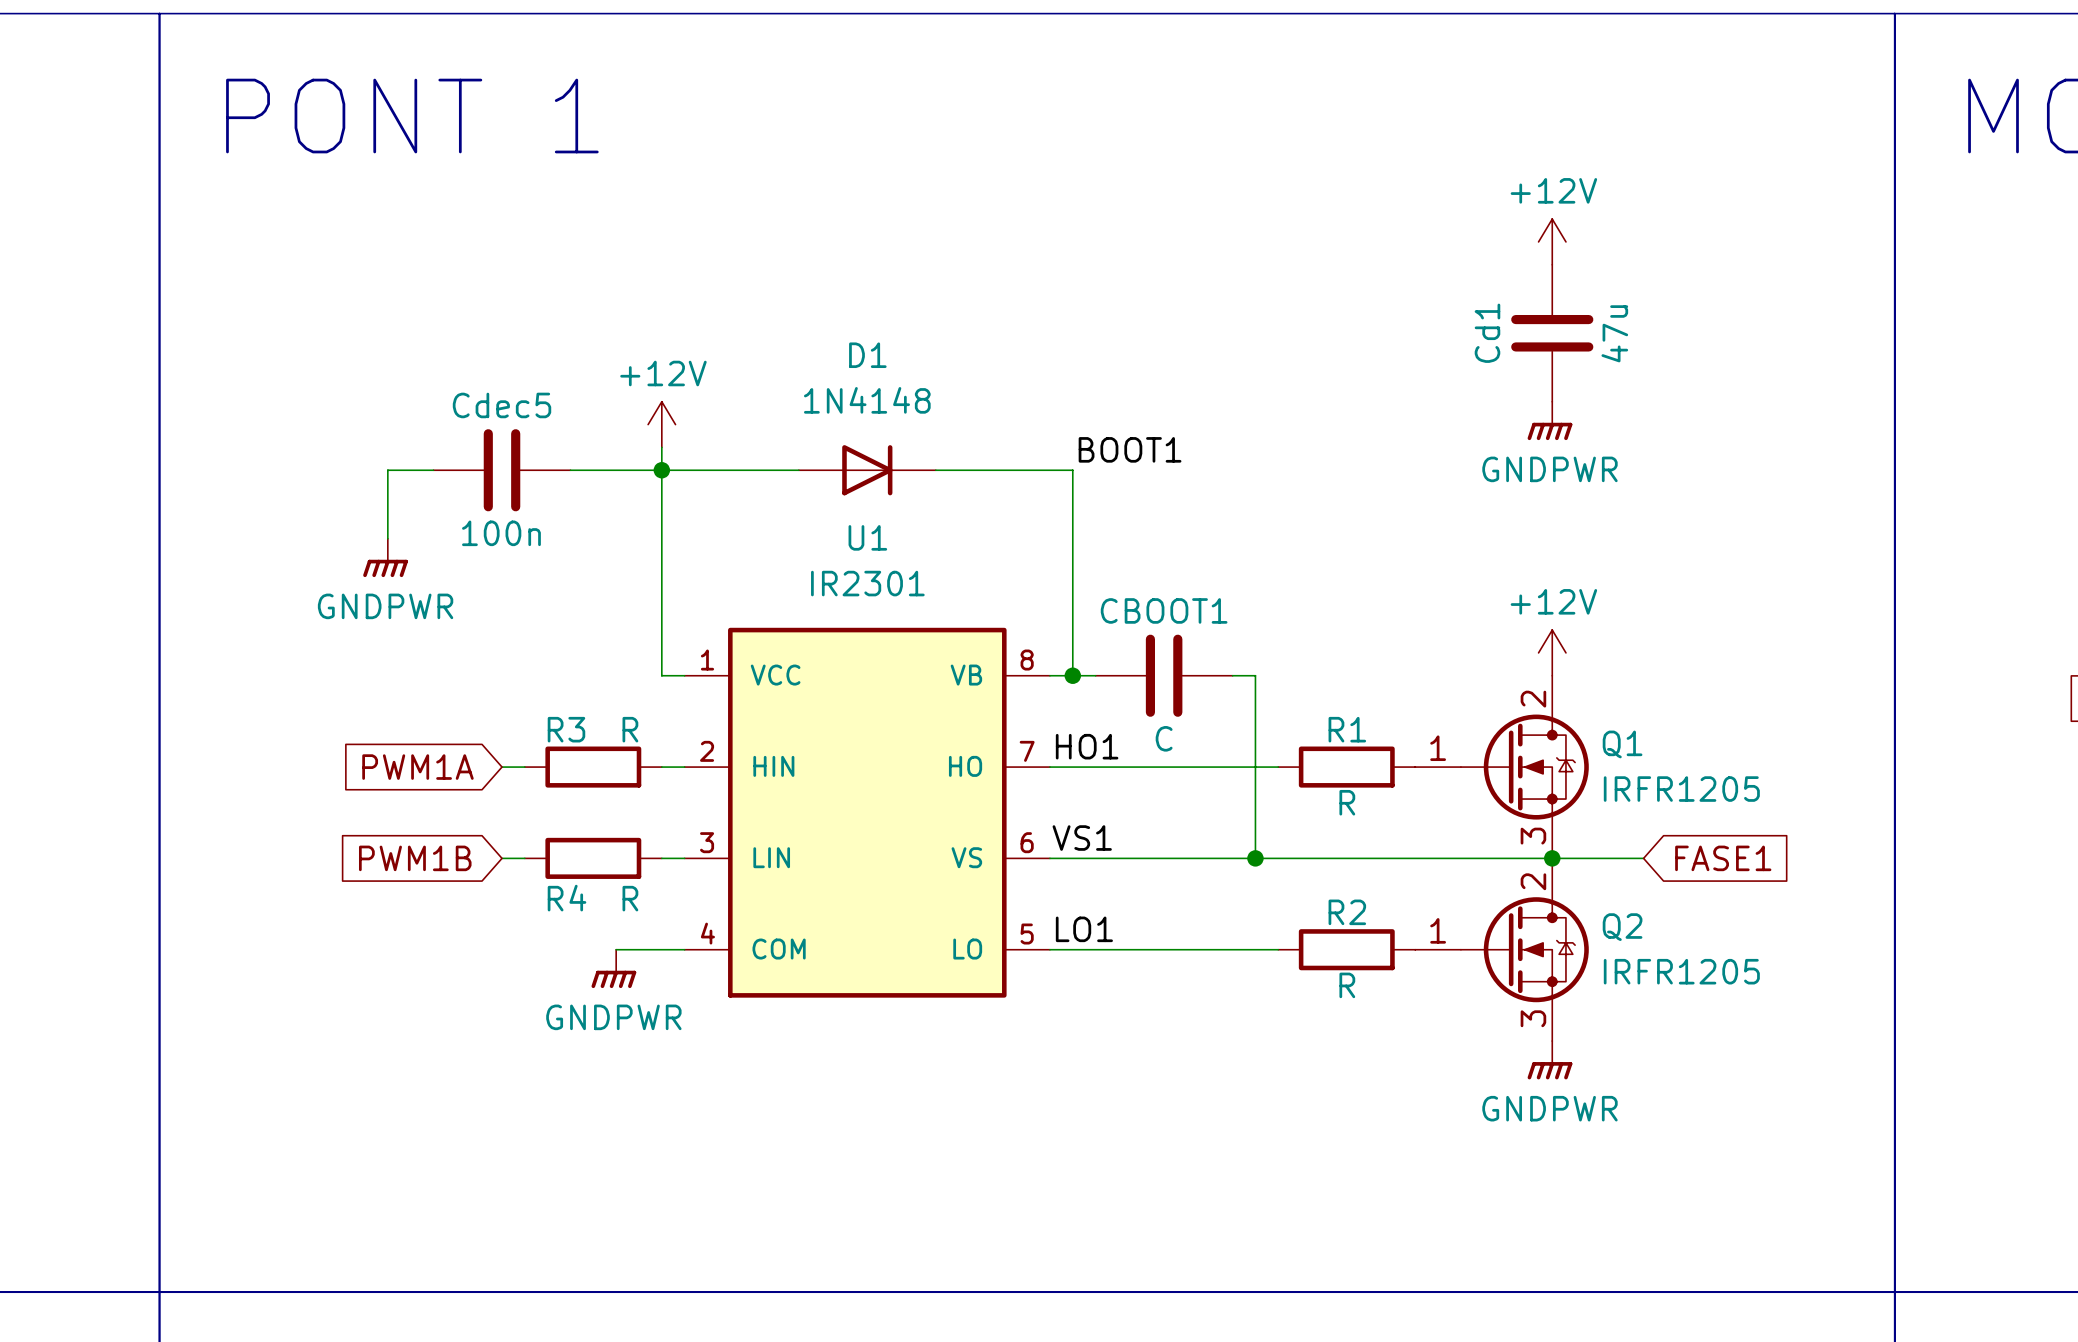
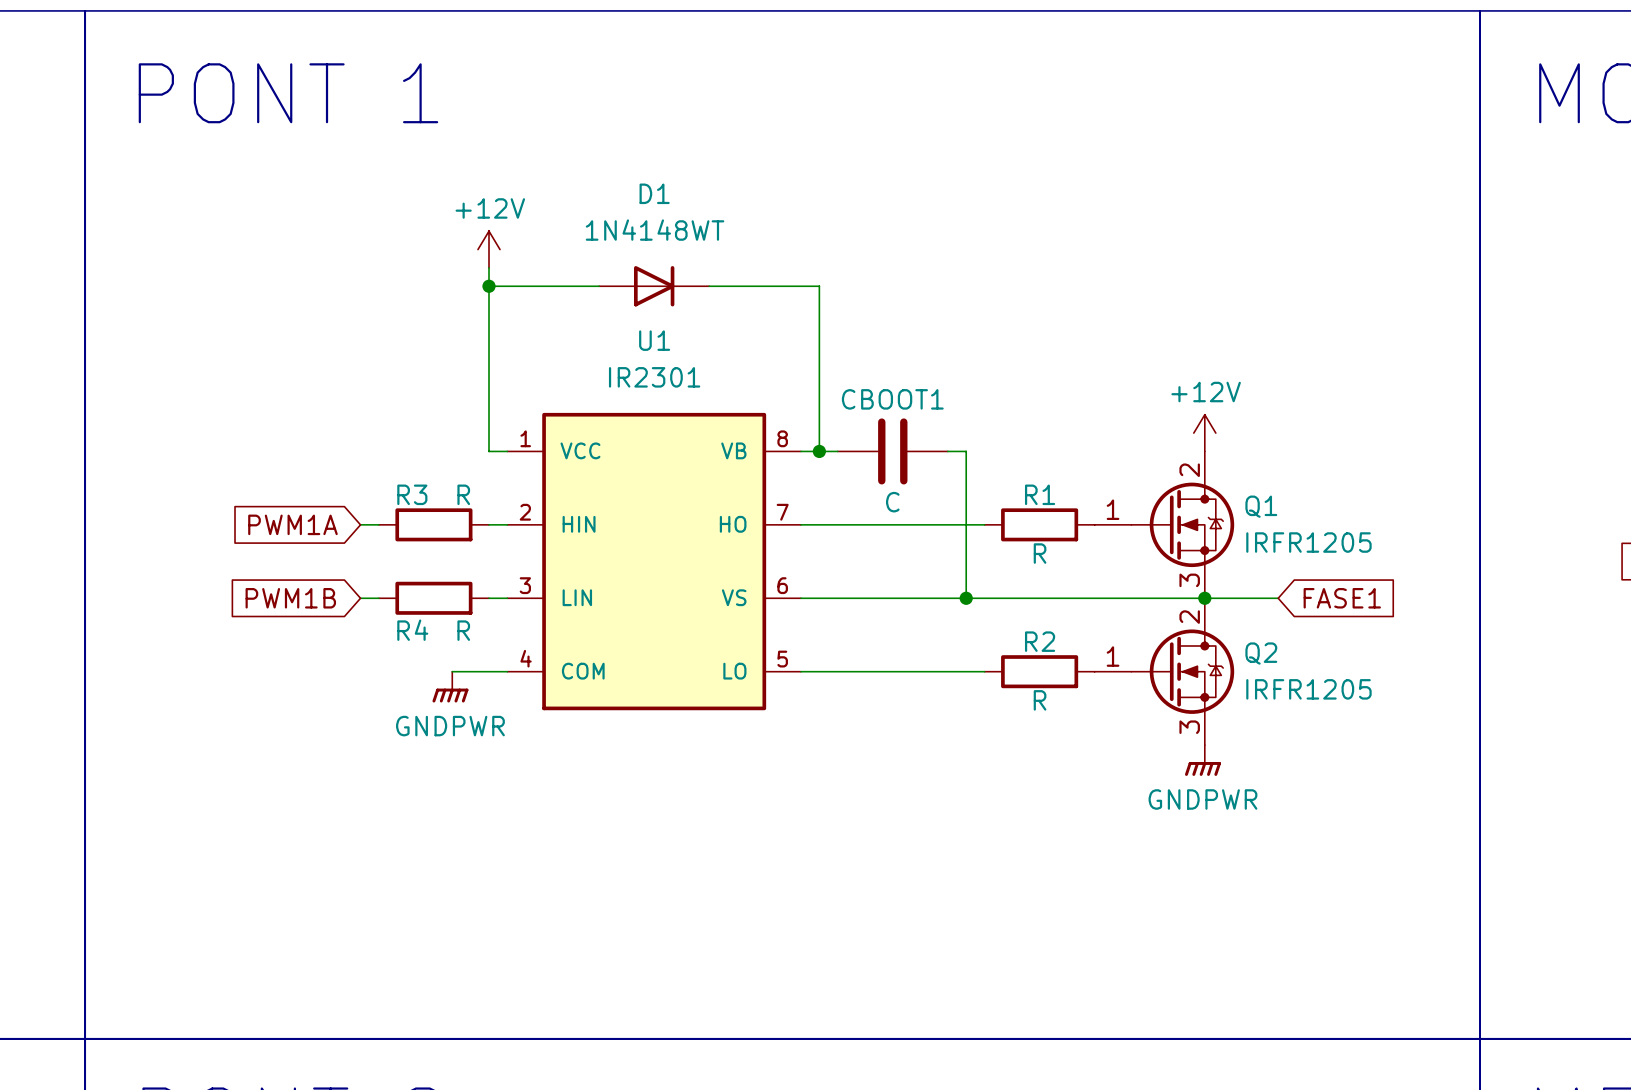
power symbol: +12V (1552, 241) -> none
wire: none -> (488, 267) (488, 359)
Cd1: 47u (1552, 333) -> none
wire: none -> (488, 286) (599, 286)
junction: none -> (488, 286)
D1 value: 1N4148 (867, 400) -> 1N4148WT (655, 230)
power symbol: GNDPWR (1549, 420) -> none
power symbol position: +12V (661, 424) -> +12V (488, 249)
label: BOOT1 (1130, 449) -> none
wire: (433, 470) (387, 470) (387, 538) -> none
Cdec5: 100n (502, 470) -> none
wire: (570, 470) (798, 470) -> none
junction: (661, 470) -> none
D1 position: (867, 470) -> (654, 286)
wire: (935, 470) (1072, 470) -> (709, 286) (819, 286) (819, 378)
power symbol: GNDPWR (385, 557) -> none
wire: (661, 561) (661, 675) (684, 675) -> (488, 451) (507, 451)
wire: (1072, 561) (1072, 675) -> none
junction: none -> (819, 451)
power symbol position: +12V (1552, 652) -> +12V (1204, 433)
wire: (1049, 675) (1095, 675) -> (801, 451) (837, 451)
junction: (1072, 675) -> none
CBOOT1 position: (1164, 675) -> (892, 451)
wire: (1232, 675) (1255, 675) -> (947, 451) (966, 451) (966, 543)
wire: (1255, 744) (1255, 858) -> none
junction: none -> (966, 598)
junction: none -> (1204, 598)
label: HO1 (1087, 746) -> none
global label position: PWM1A (417, 767) -> PWM1A (292, 524)
wire: (502, 767) (524, 767) -> (360, 524) (378, 524)
R3 position: (593, 767) -> (433, 524)
wire: (661, 767) (684, 767) -> (488, 524) (507, 524)
wire: (1049, 767) (1278, 767) -> (801, 524) (984, 524)
R1 position: (1346, 767) -> (1039, 524)
Q1 position: (1502, 767) -> (1164, 524)
U1 position: (867, 812) -> (654, 561)
label: VS1 (1082, 838) -> none
global label position: PWM1B (415, 858) -> PWM1B (290, 598)
wire: (502, 858) (524, 858) -> (360, 598) (378, 598)
R4 position: (593, 858) -> (433, 598)
wire: (661, 858) (684, 858) -> (488, 598) (507, 598)
wire: (1049, 858) (1643, 858) -> (801, 598) (1278, 598)
junction: (1255, 858) -> none
junction: (1552, 858) -> none
global label position: FASE1 (1723, 858) -> FASE1 (1342, 598)
label: LO1 (1084, 929) -> none
wire: (616, 949) (684, 949) -> (452, 671) (507, 671)
wire: (1049, 949) (1278, 949) -> (801, 671) (984, 671)
R2 position: (1346, 949) -> (1039, 671)
Q2 position: (1502, 949) -> (1164, 671)
power symbol position: GNDPWR (613, 968) -> GNDPWR (450, 687)
power symbol position: GNDPWR (1549, 1060) -> GNDPWR (1202, 760)

